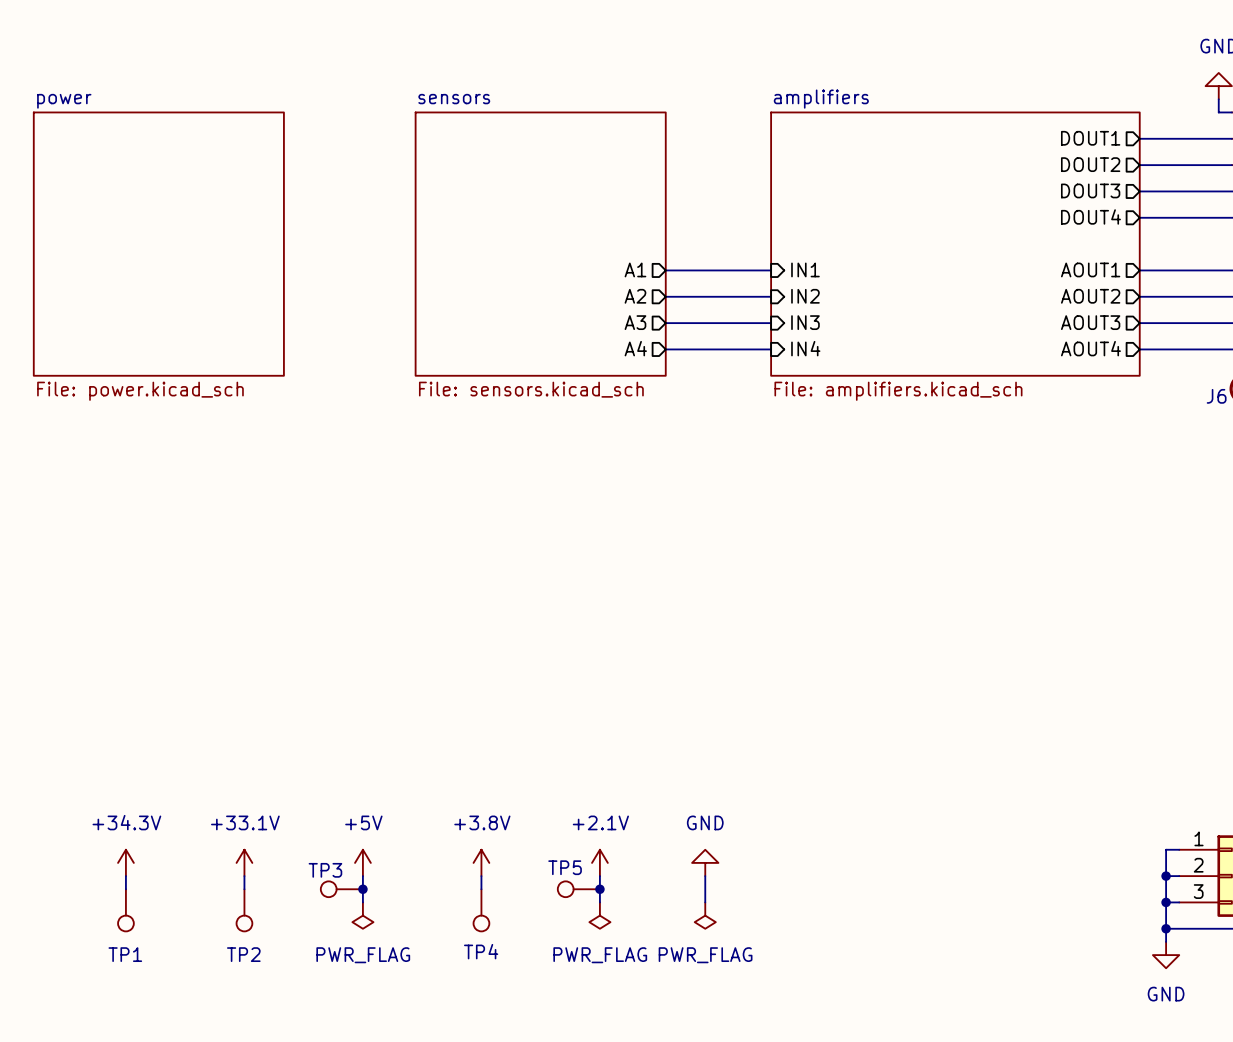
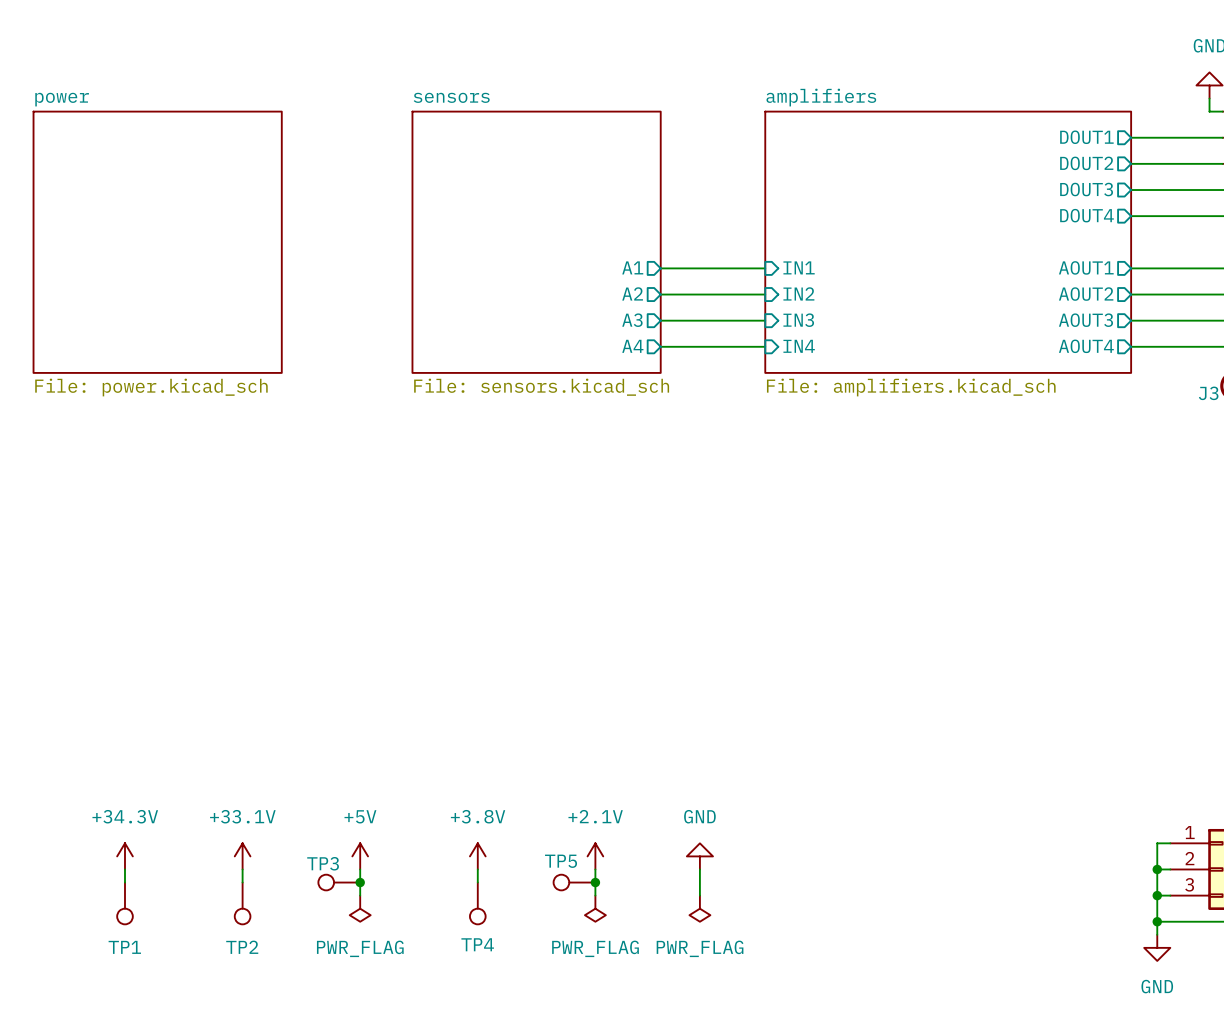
J6 name: J6 (1216, 396) -> J3 (1208, 393)

